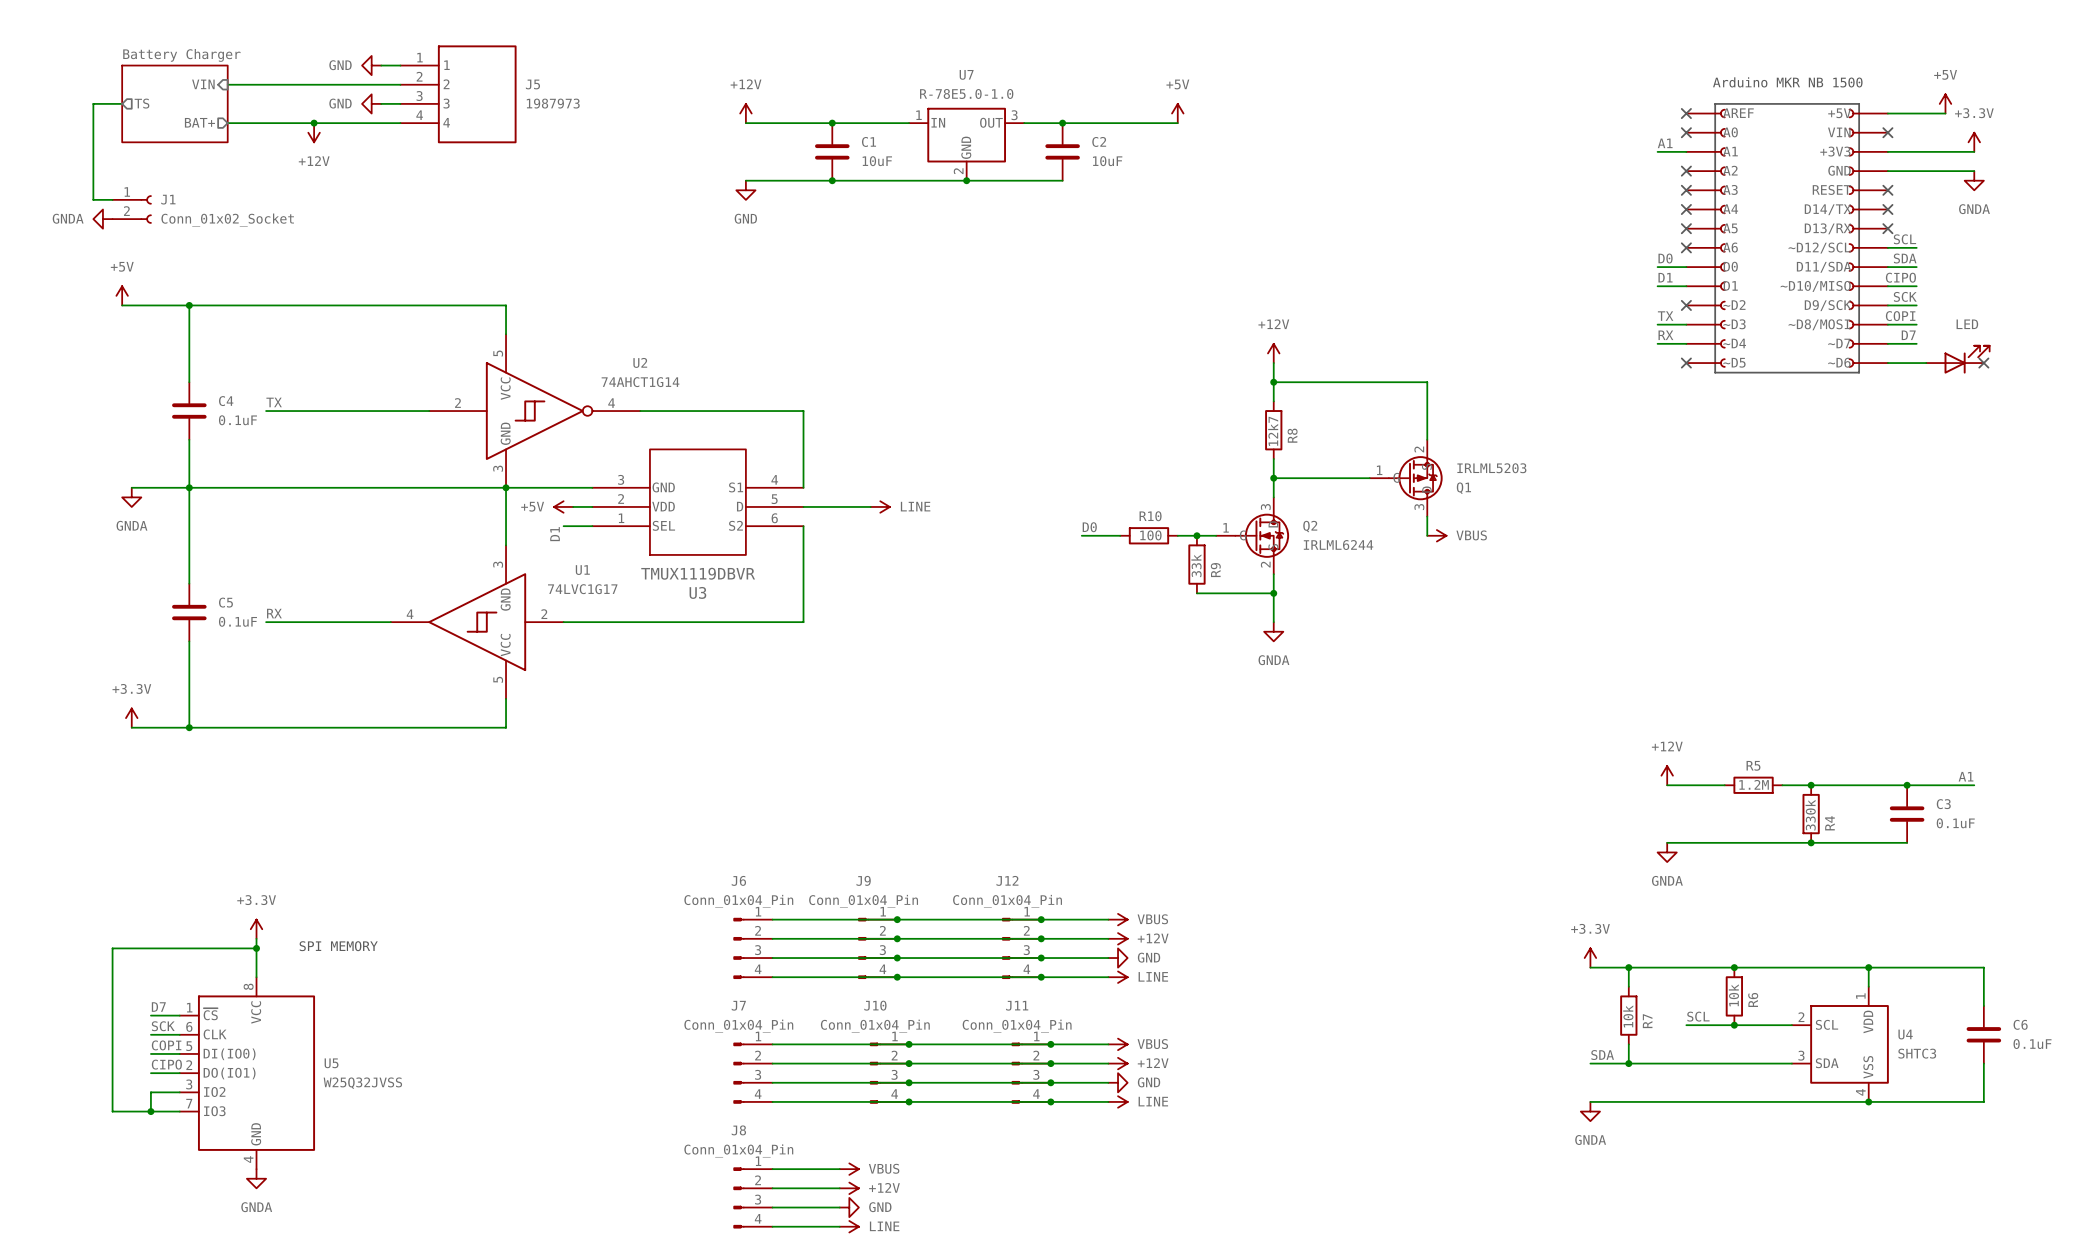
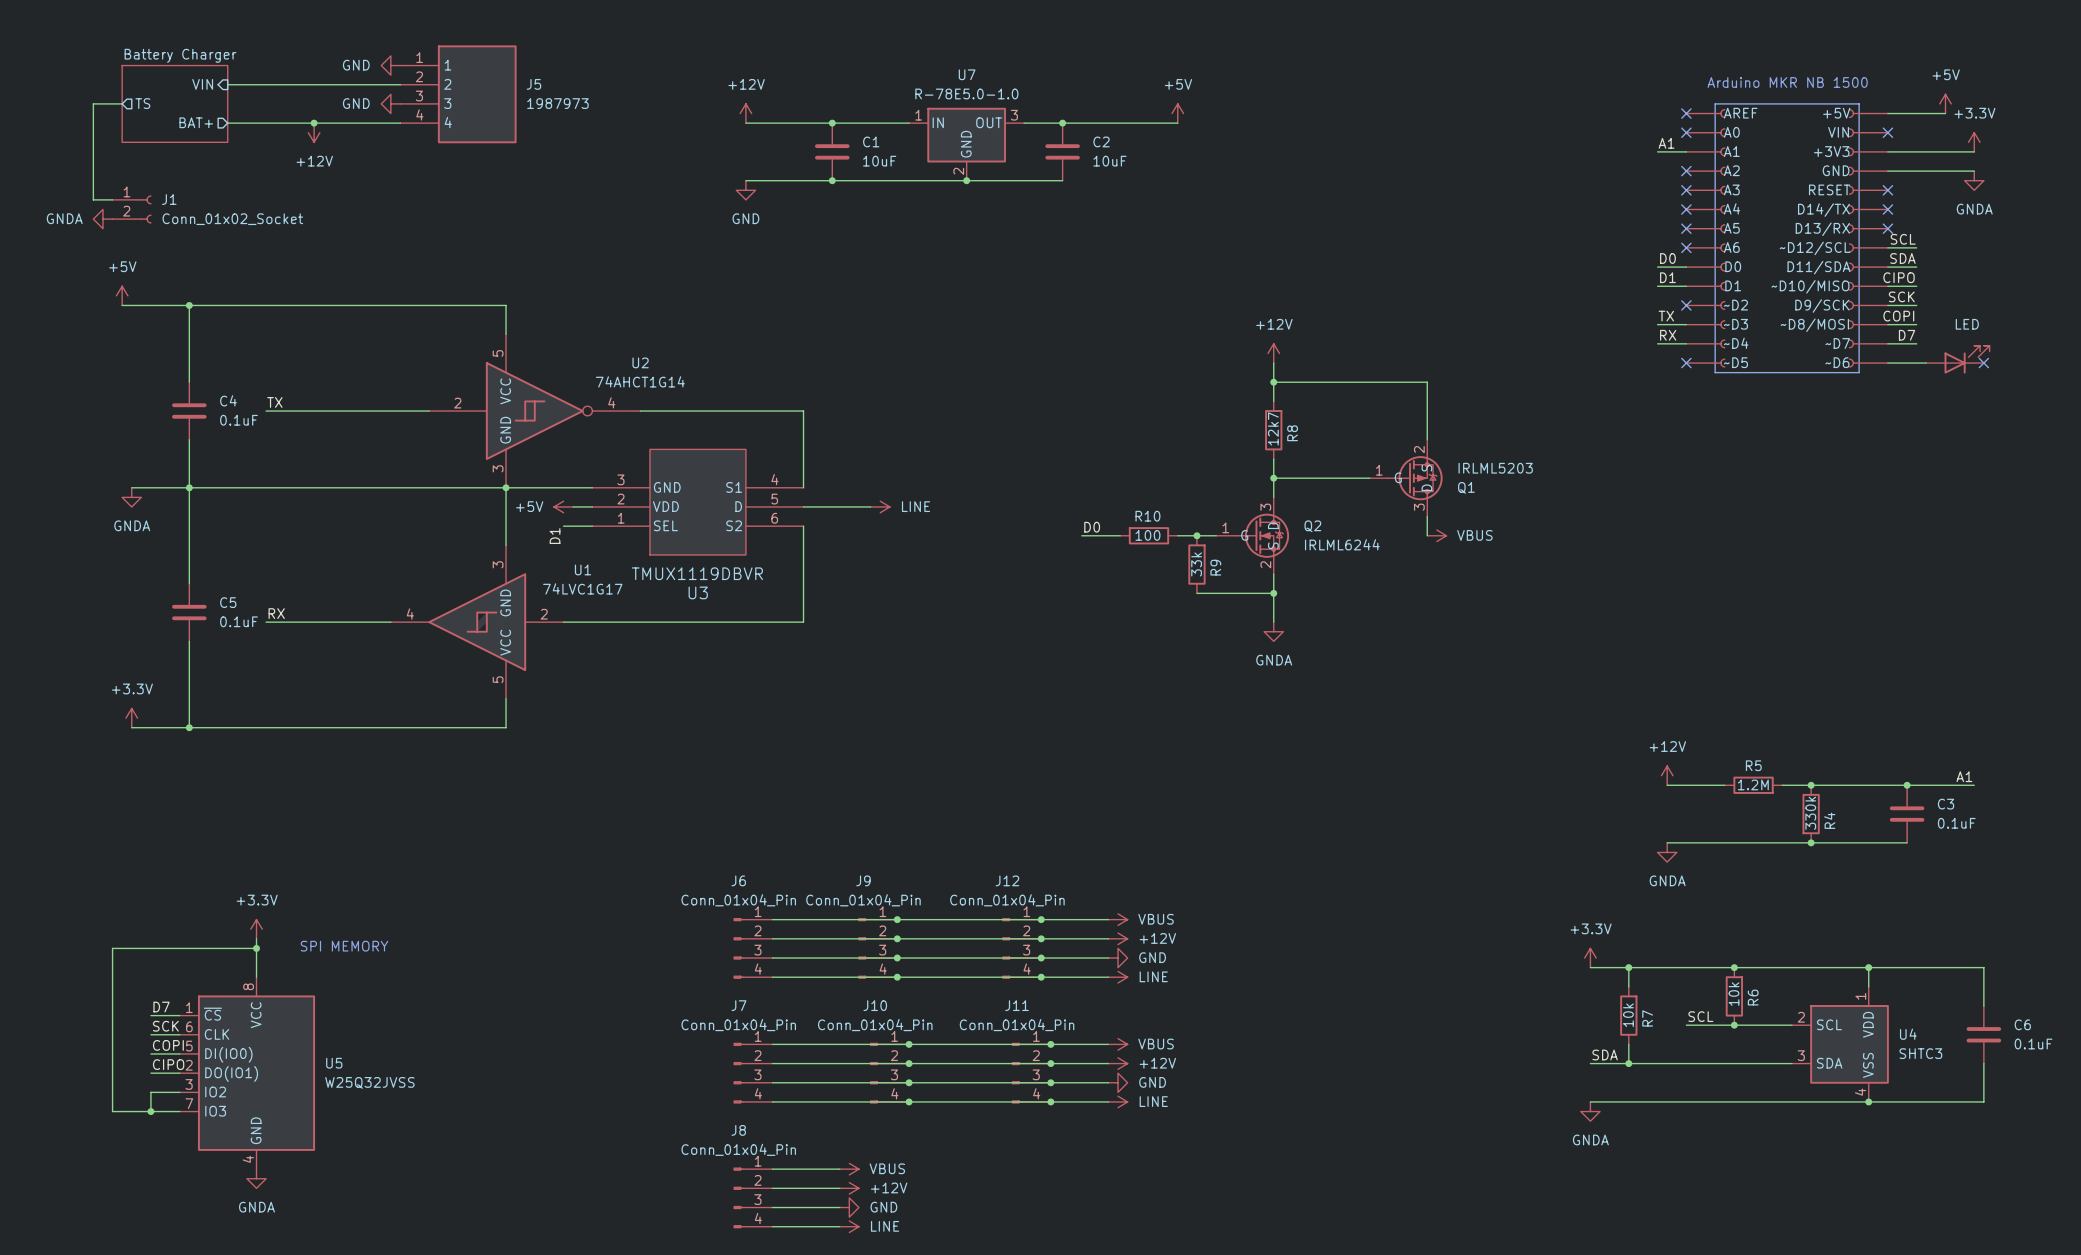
power symbol position: GND (371, 65) -> GND (390, 65)
power symbol position: GND (371, 103) -> GND (390, 103)

